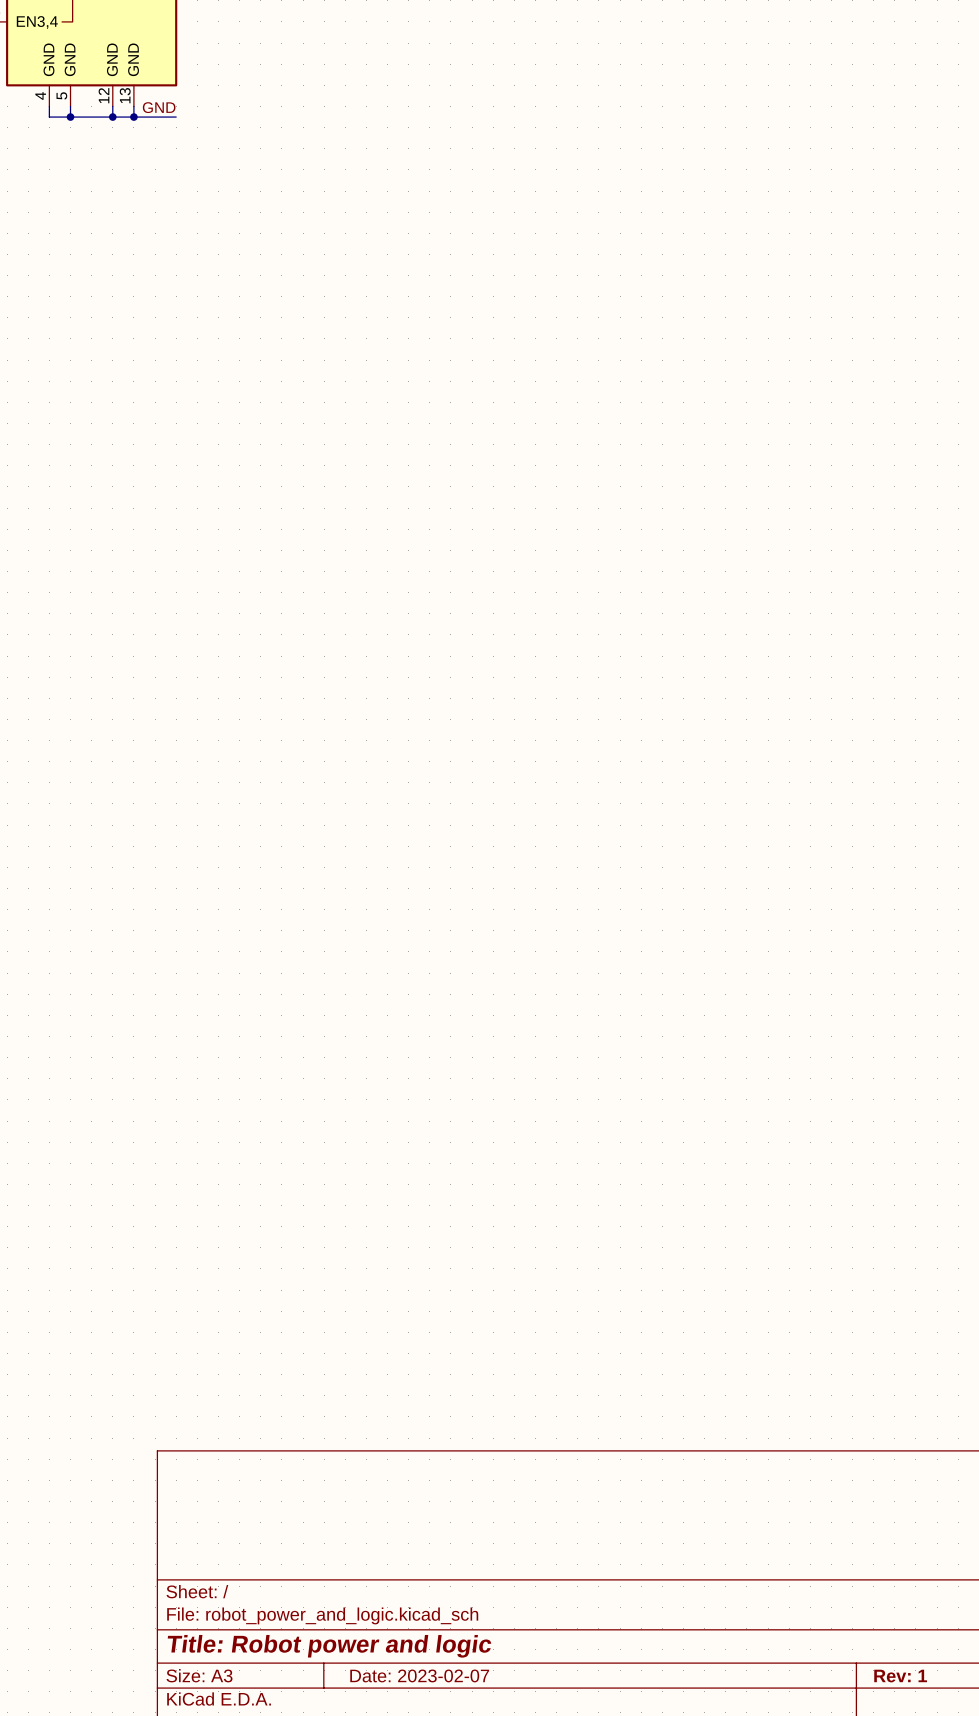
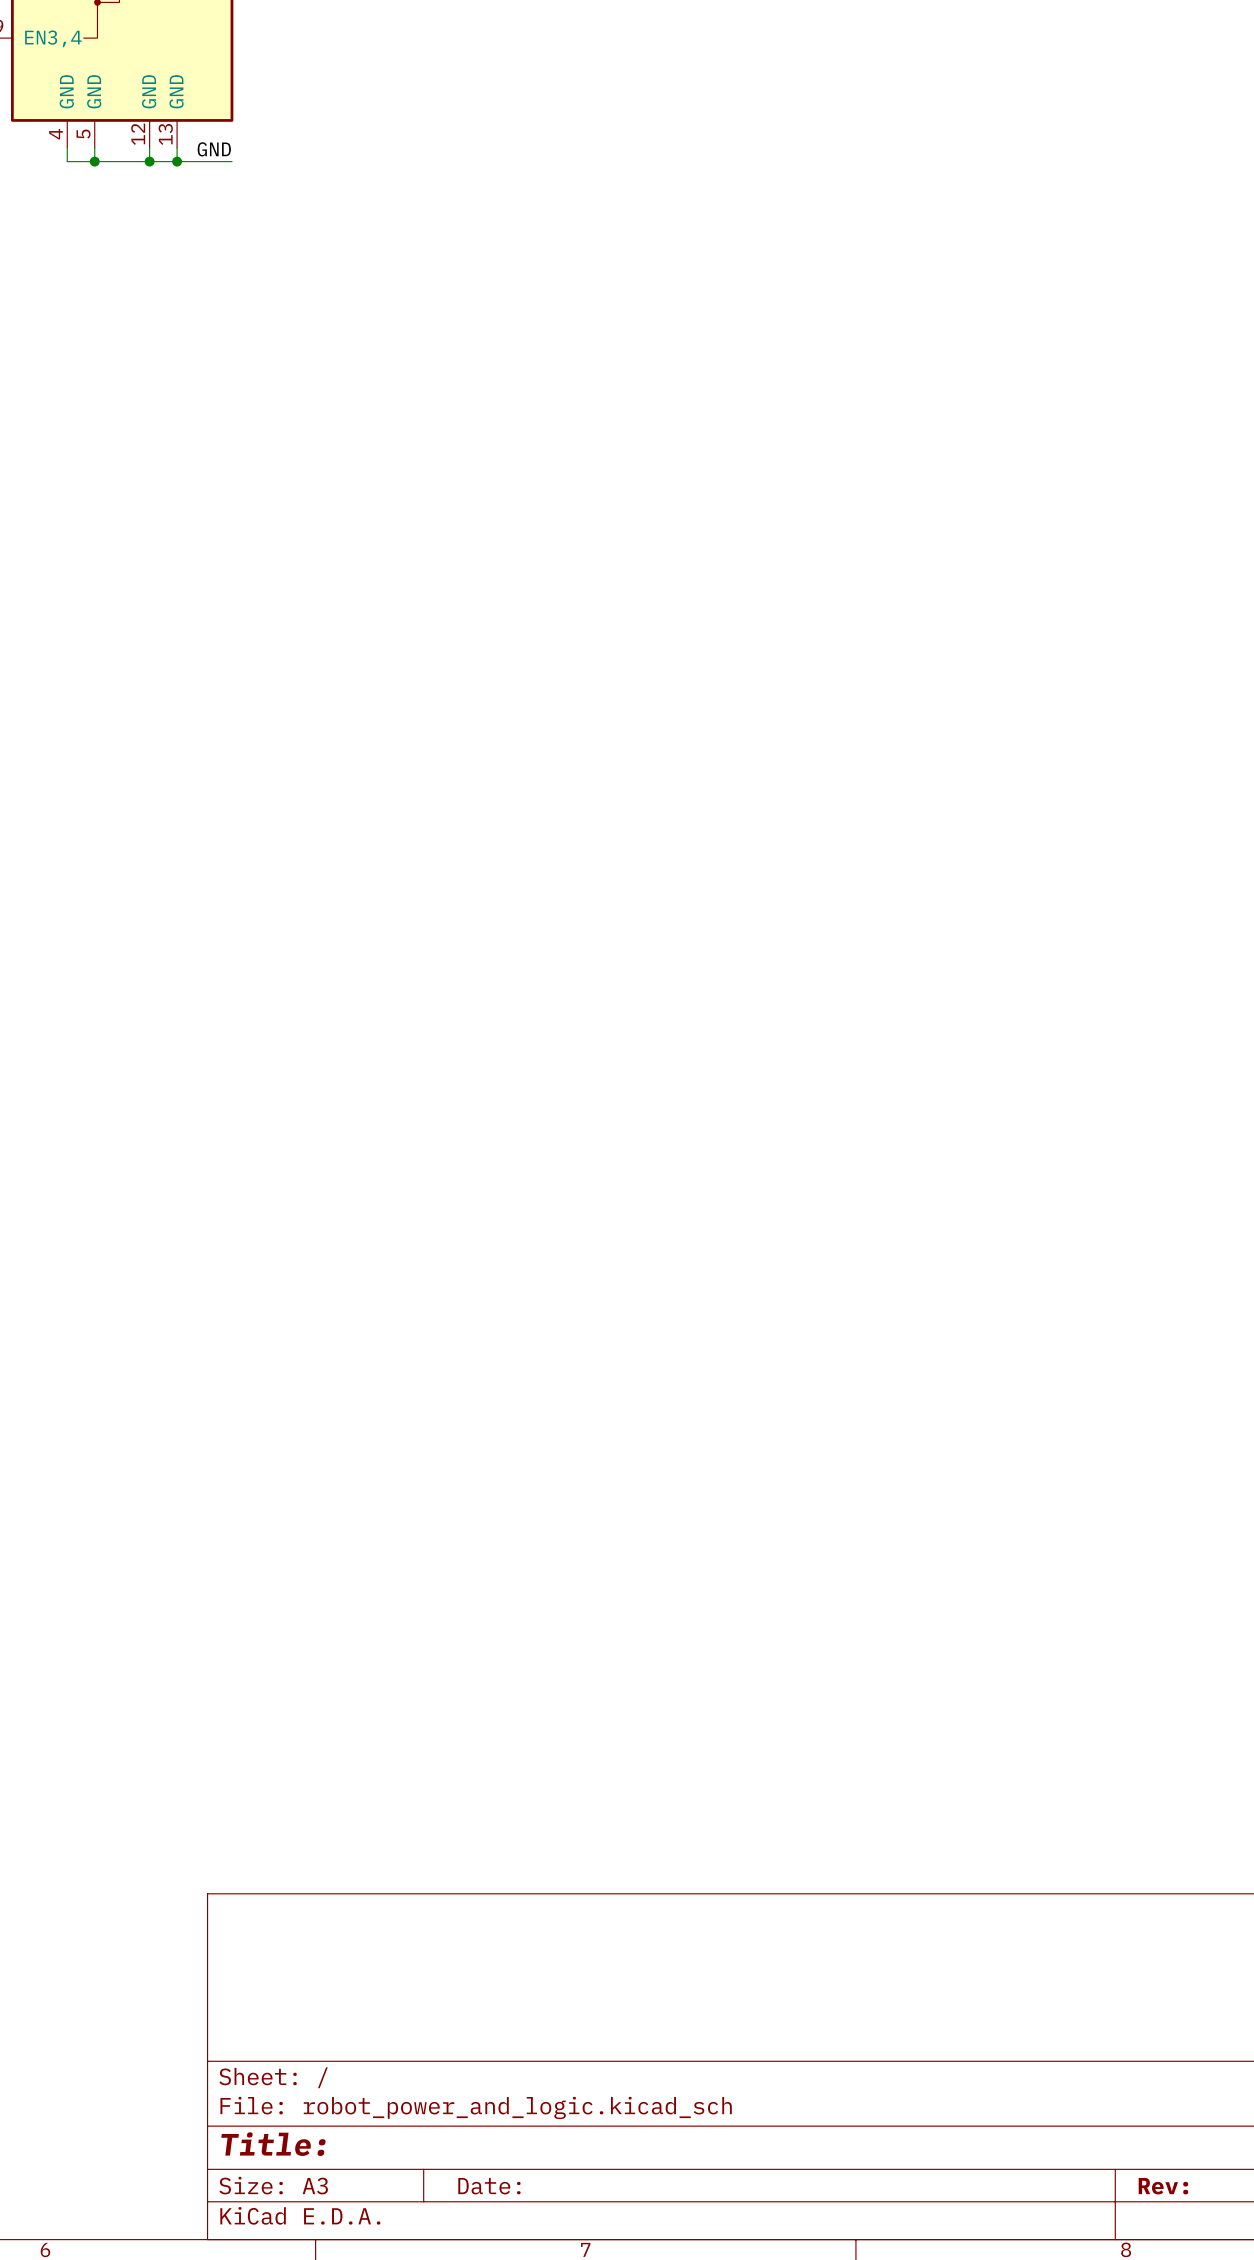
title block: Title: Robot power and logic (329, 1646) -> Title: (273, 2144)
title block: Date: 2023-02-07 (419, 1675) -> Date: (489, 2186)
title block: Rev: 1 (900, 1676) -> Rev: (1163, 2186)

